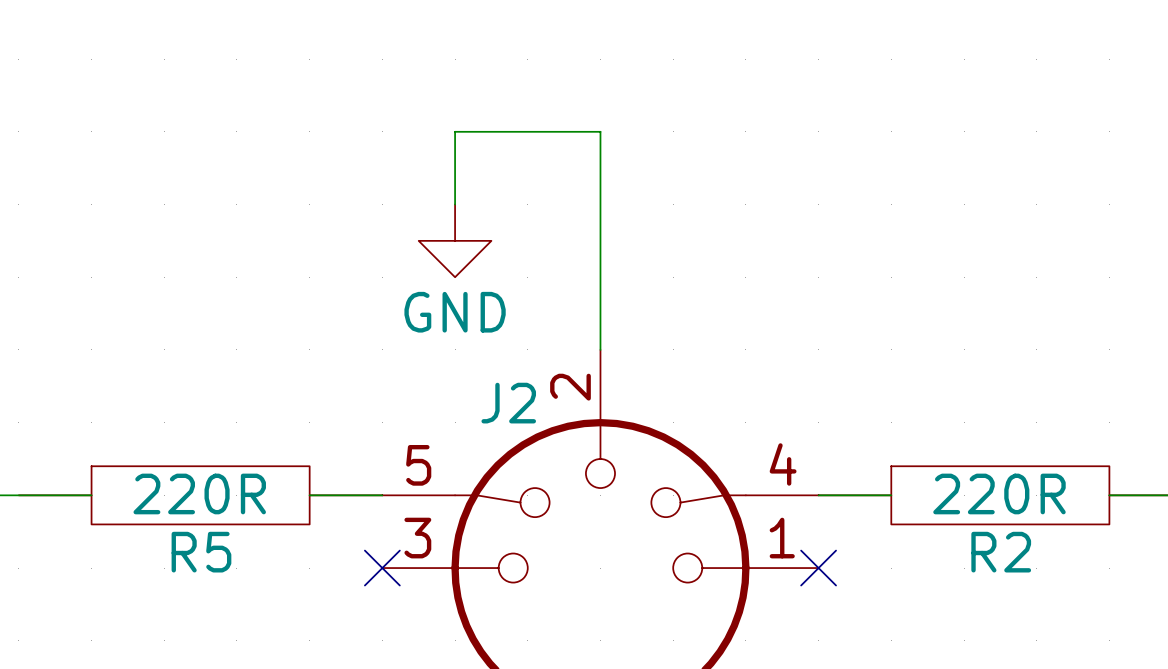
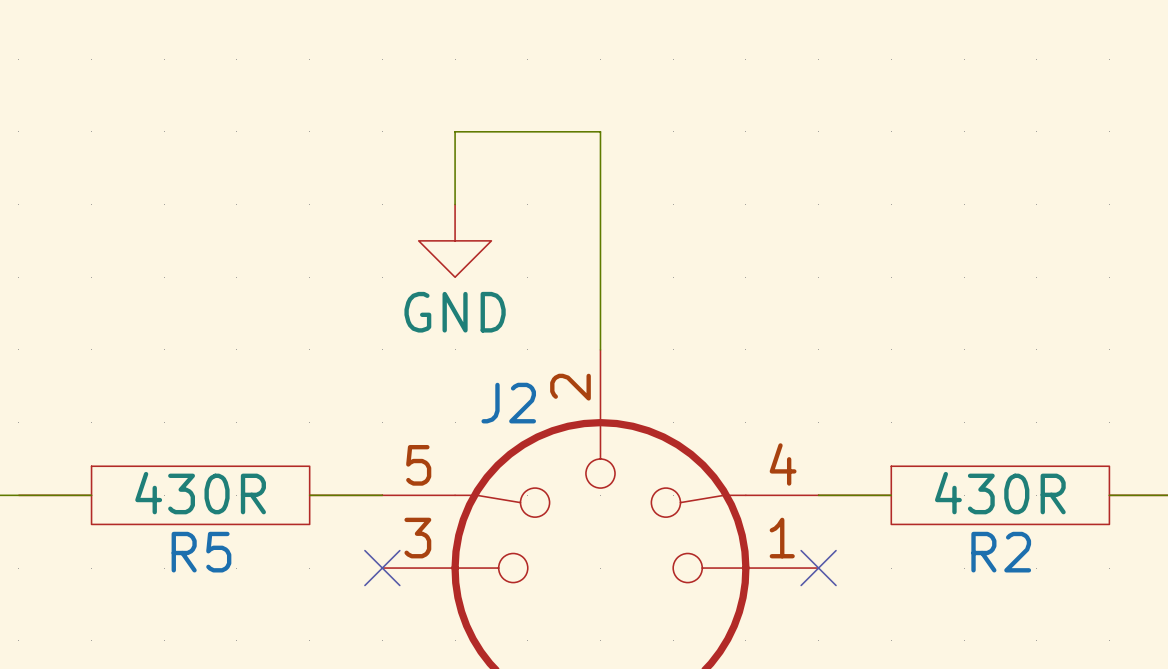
R5 value: 220R (199, 493) -> 430R (200, 493)
R2 value: 220R (999, 493) -> 430R (1000, 493)

